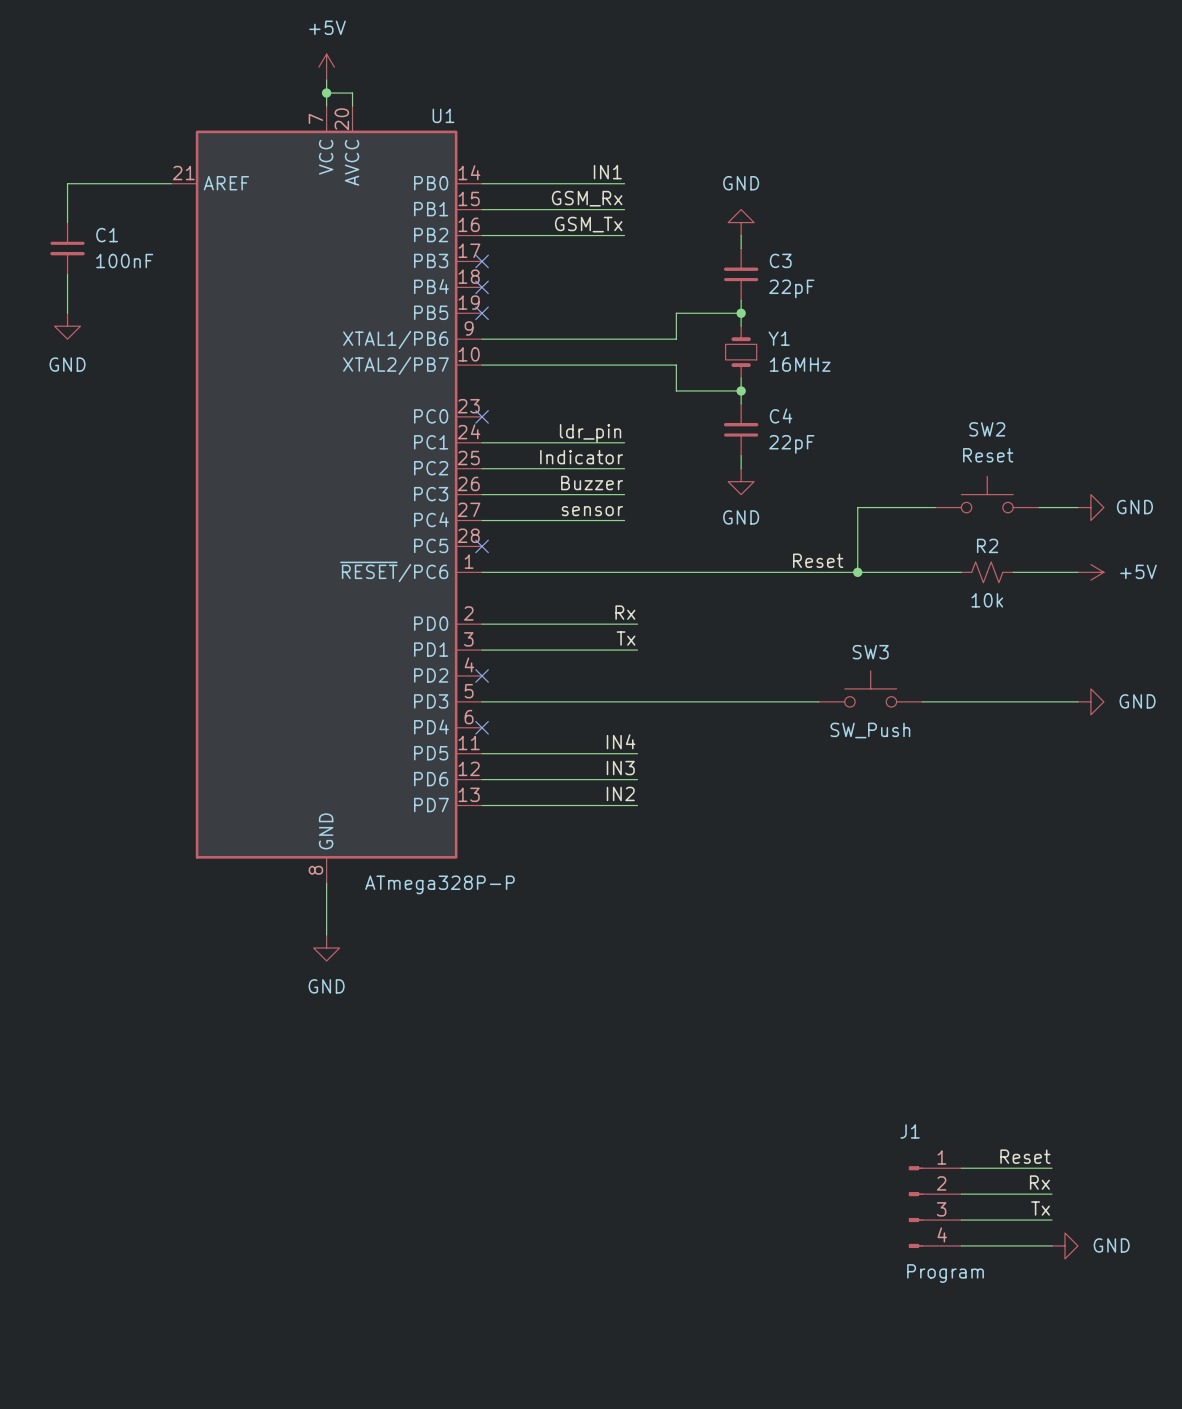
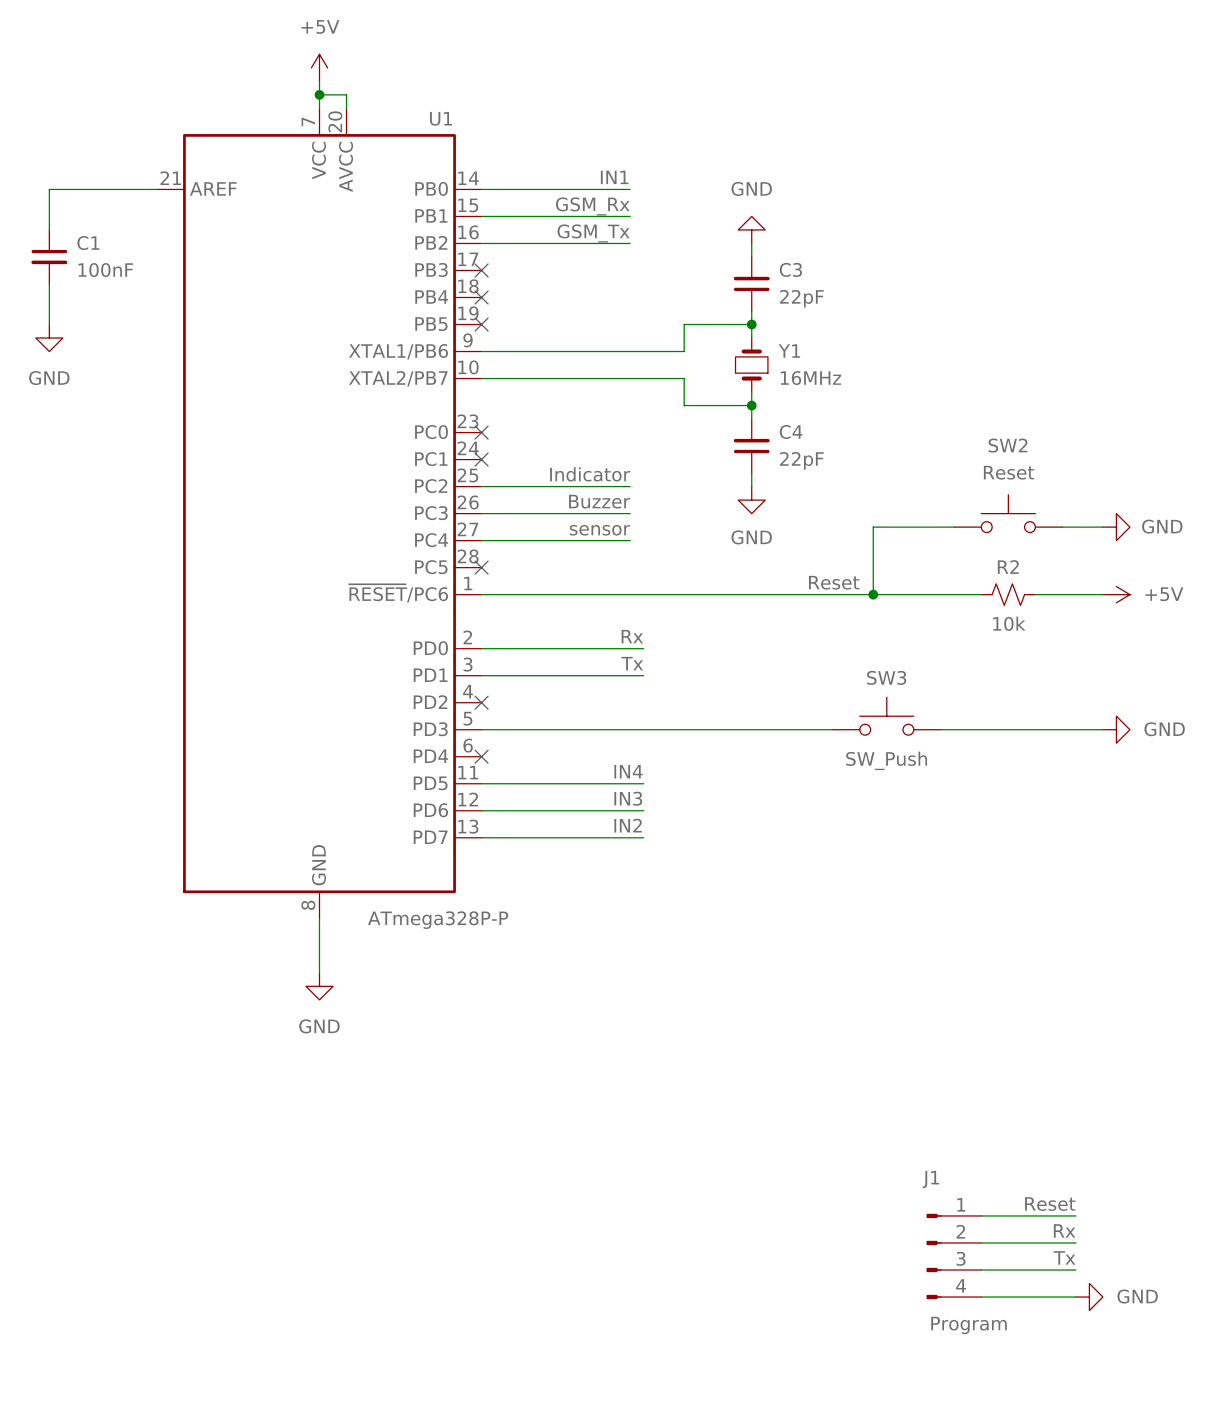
label: ldr_pin (590, 433) -> none
wire: (482, 442) (624, 442) -> none
no-connect mark: none -> (481, 459)

